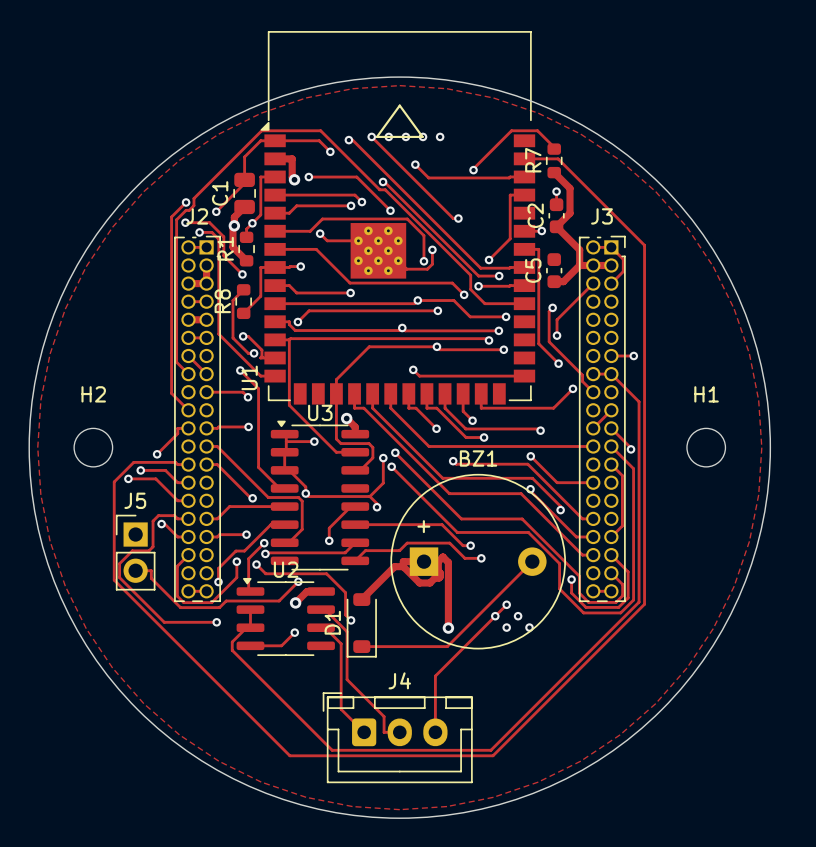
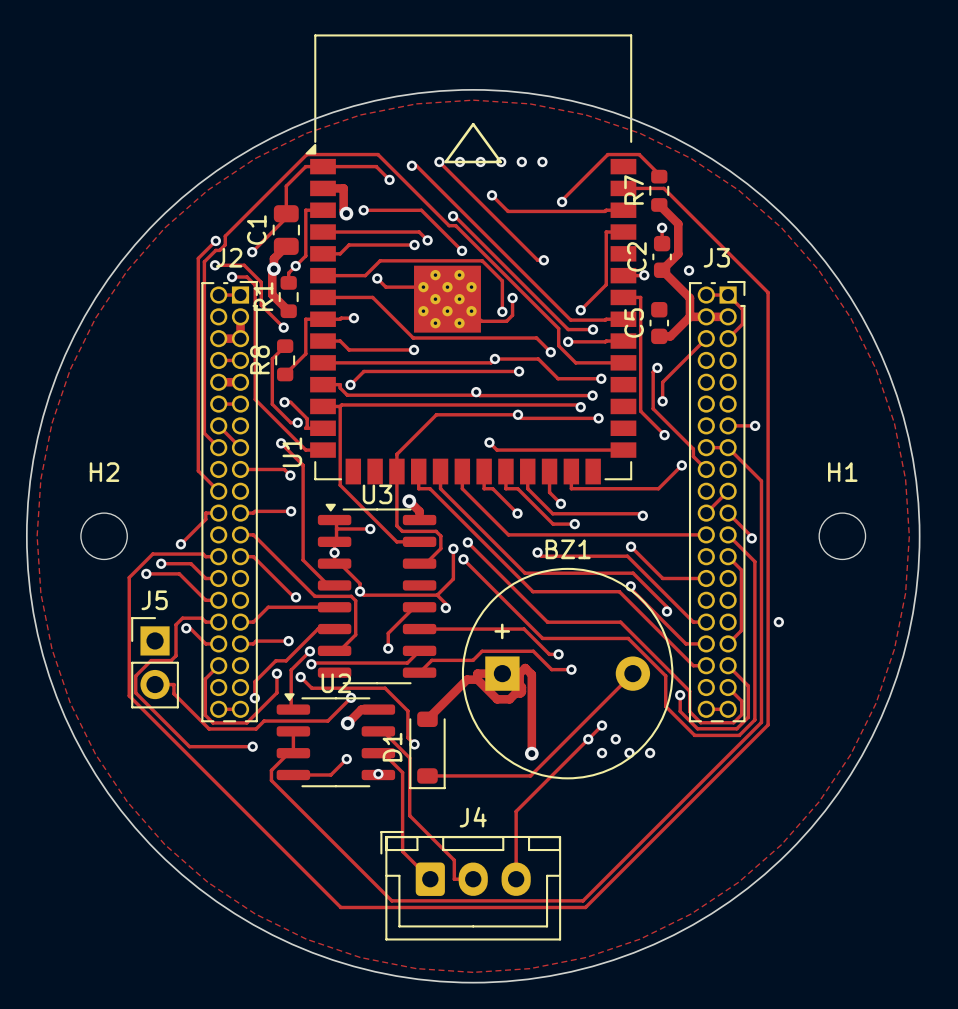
via: none -> (542, 161)
via: none -> (689, 270)
via: none -> (334, 552)
via: none -> (778, 622)
via: none -> (650, 753)
via: none -> (378, 774)

